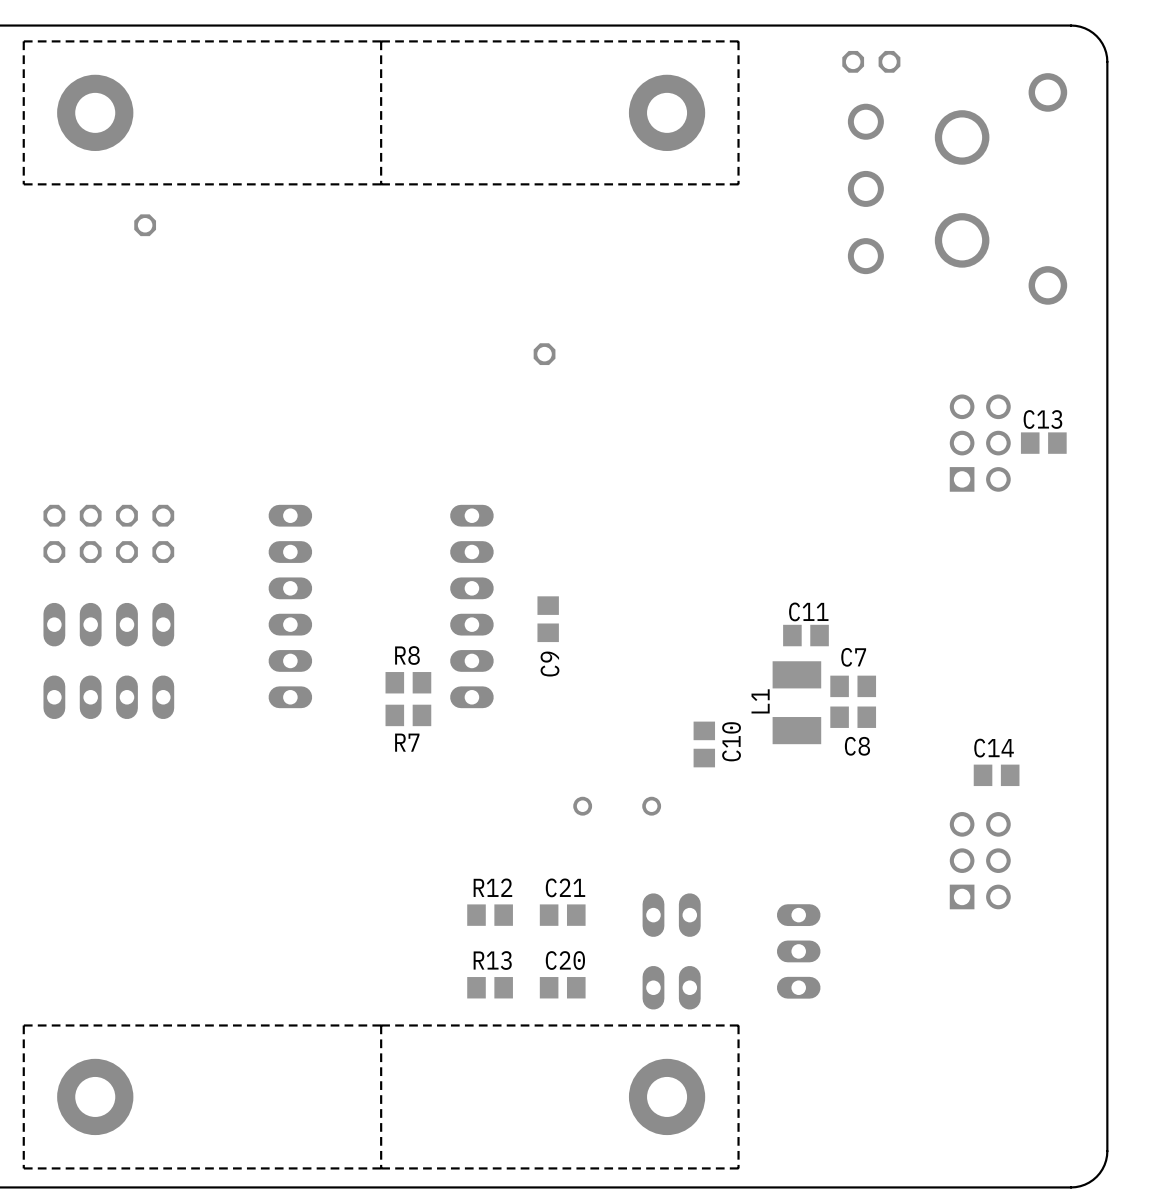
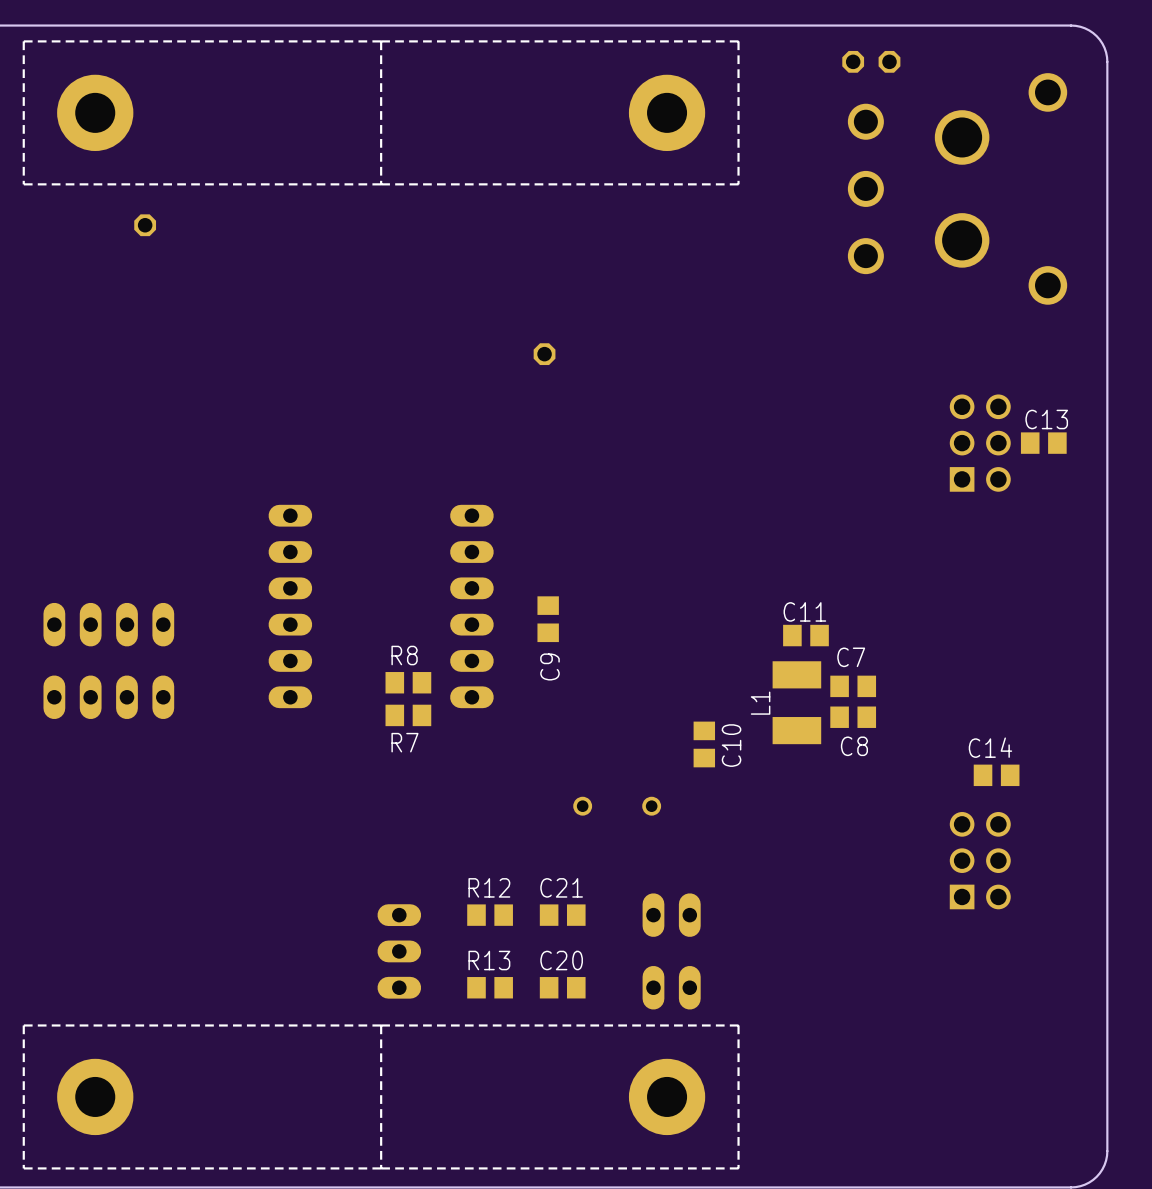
part: (108, 533) -> none
part: none -> (399, 951)
part: (798, 951) -> none

